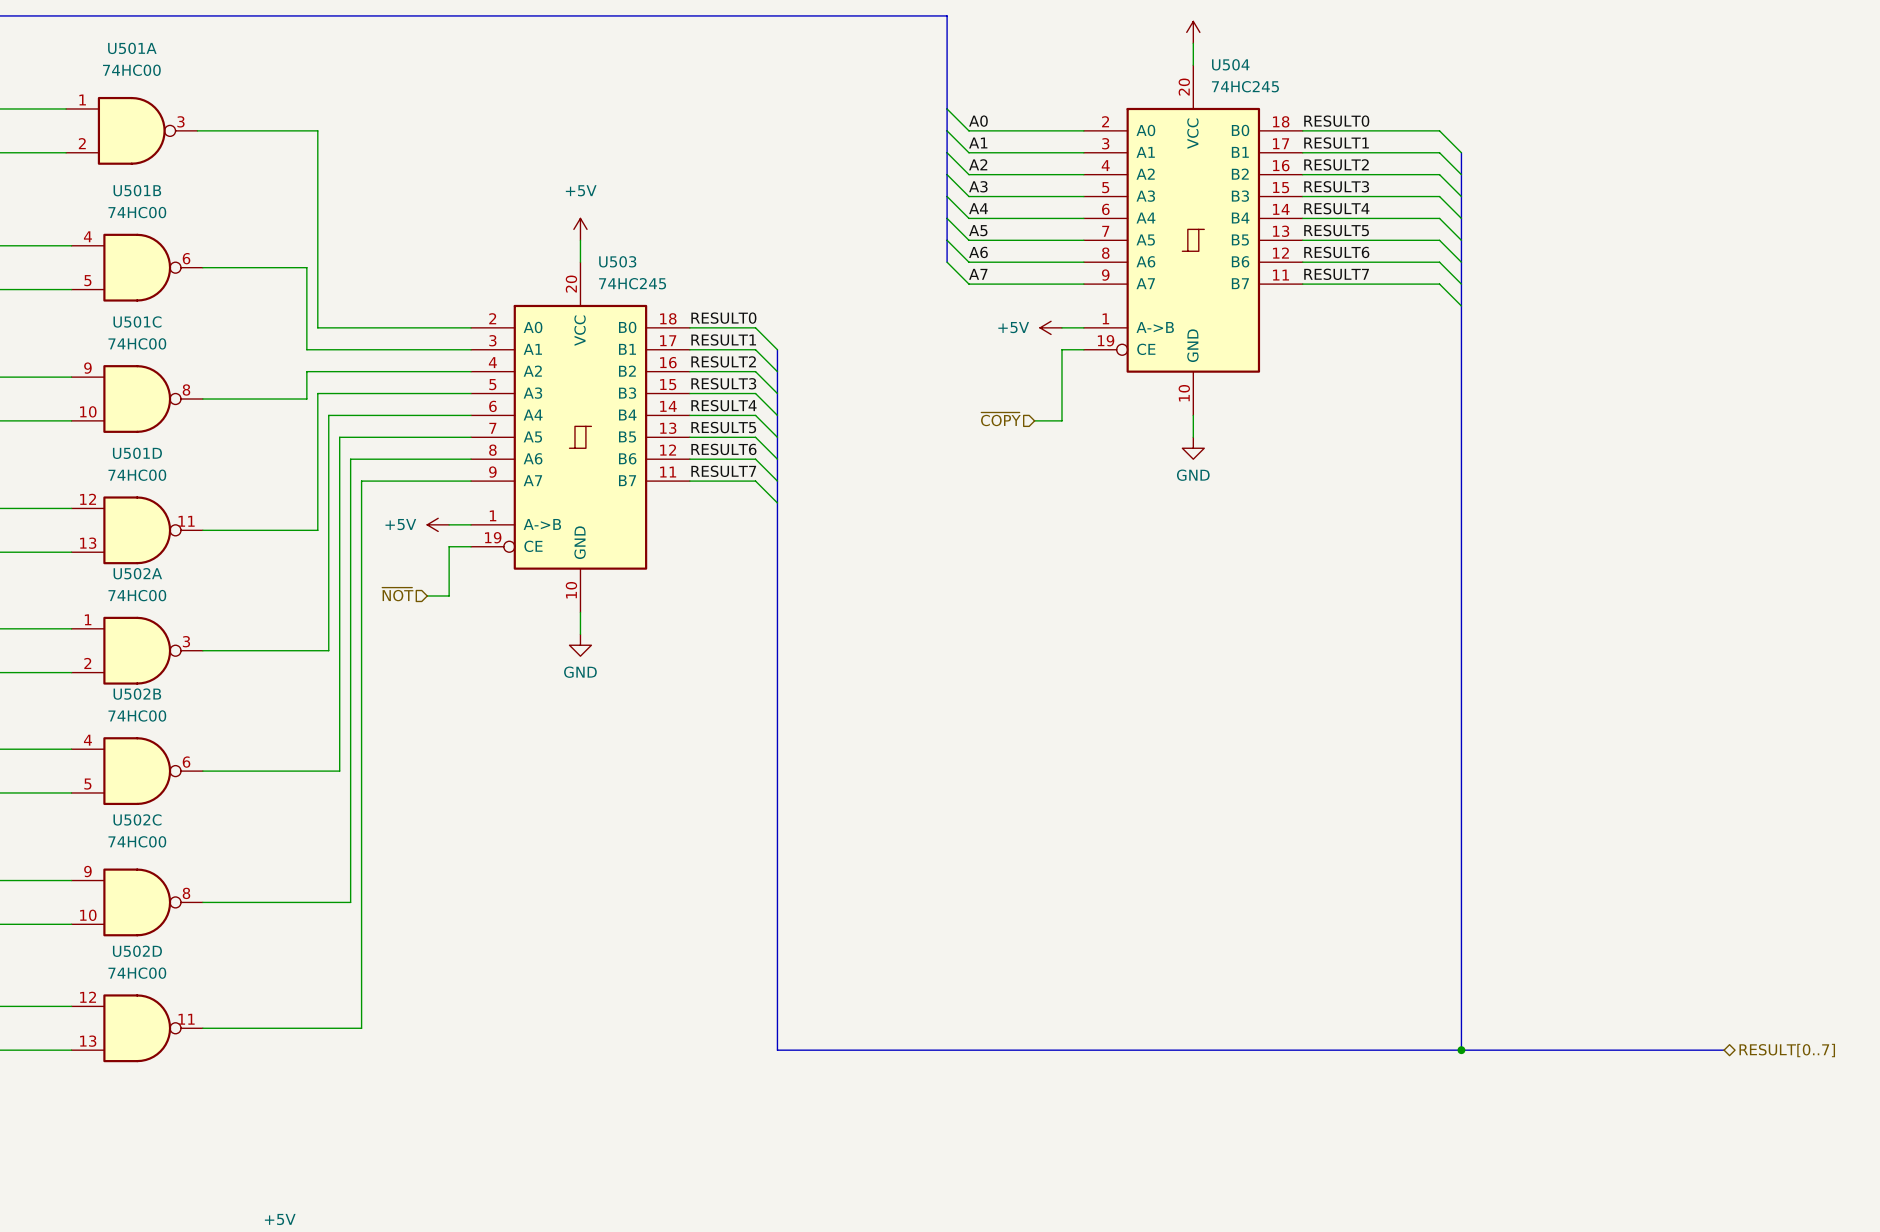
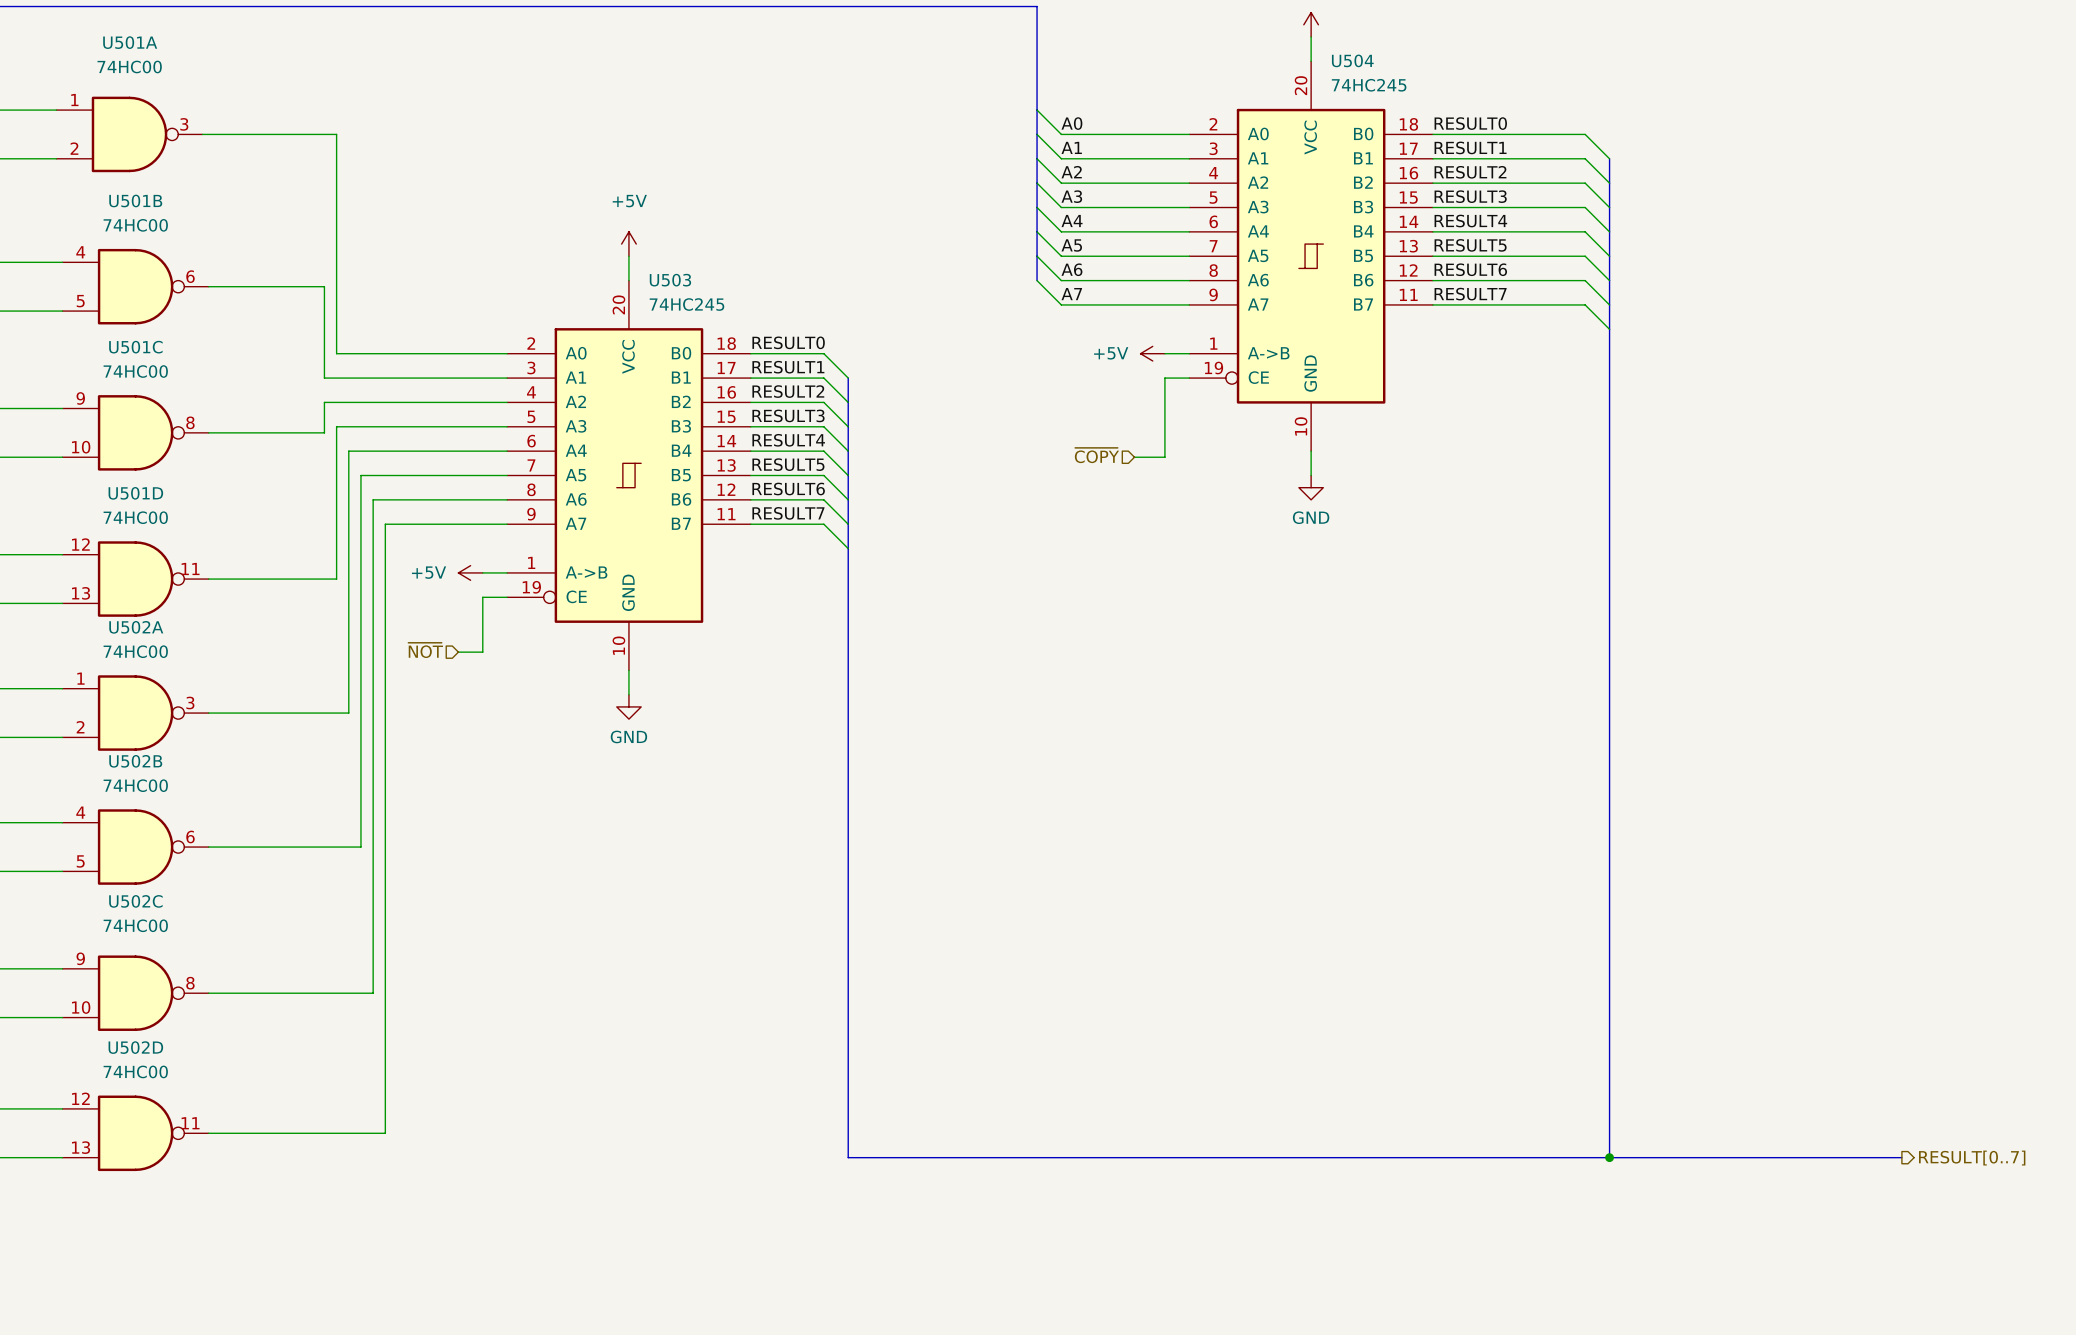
hierarchical label shape: bidirectional (1787, 1050) -> output (1972, 1158)

